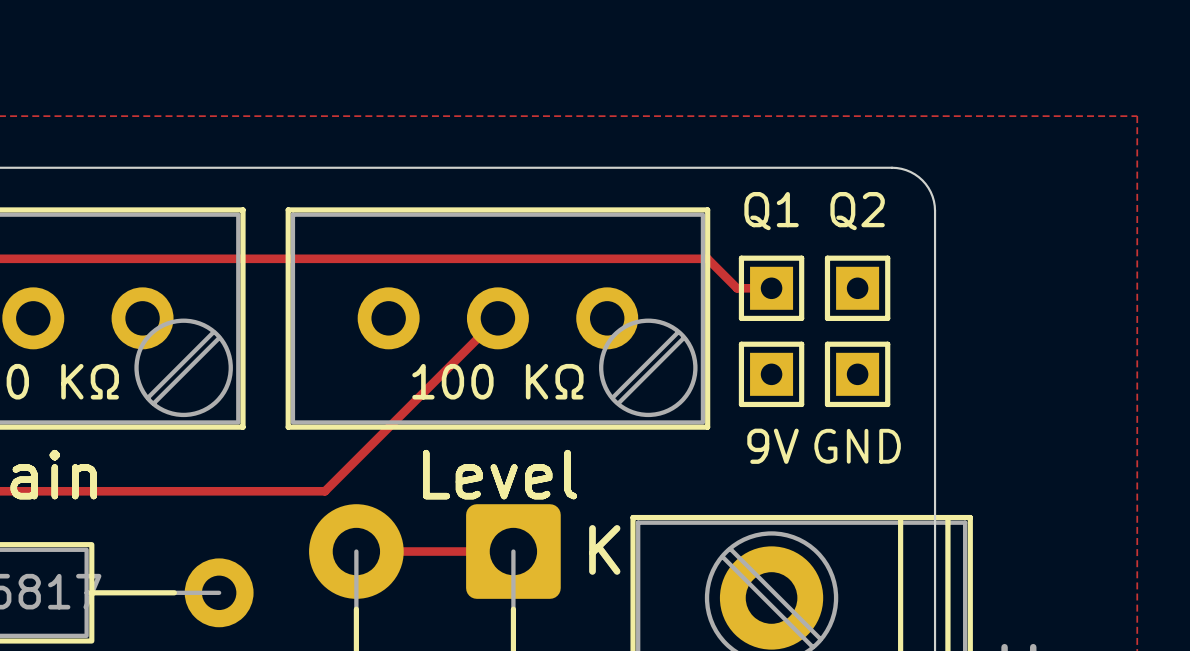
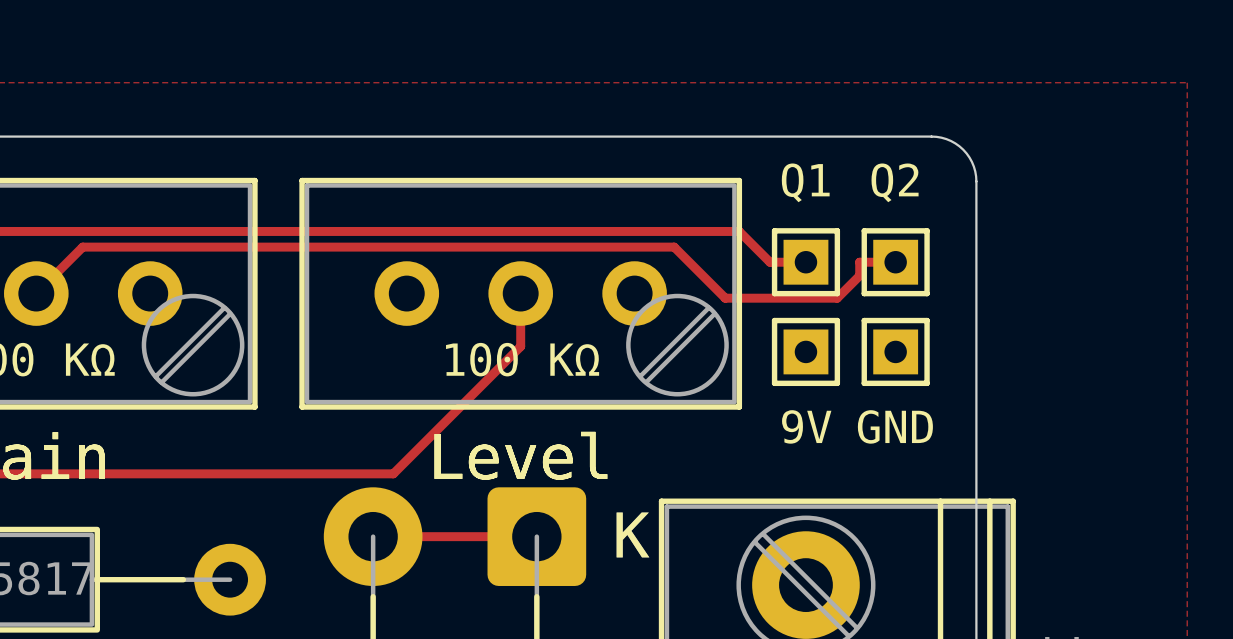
track: none -> (895, 262) (859, 262) (859, 275) (837, 298) (725, 298) (674, 247) (82, 247) (36, 293)
track: (497, 318) (324, 491) -> (520, 293) (520, 346) (393, 473) (340, 473)

